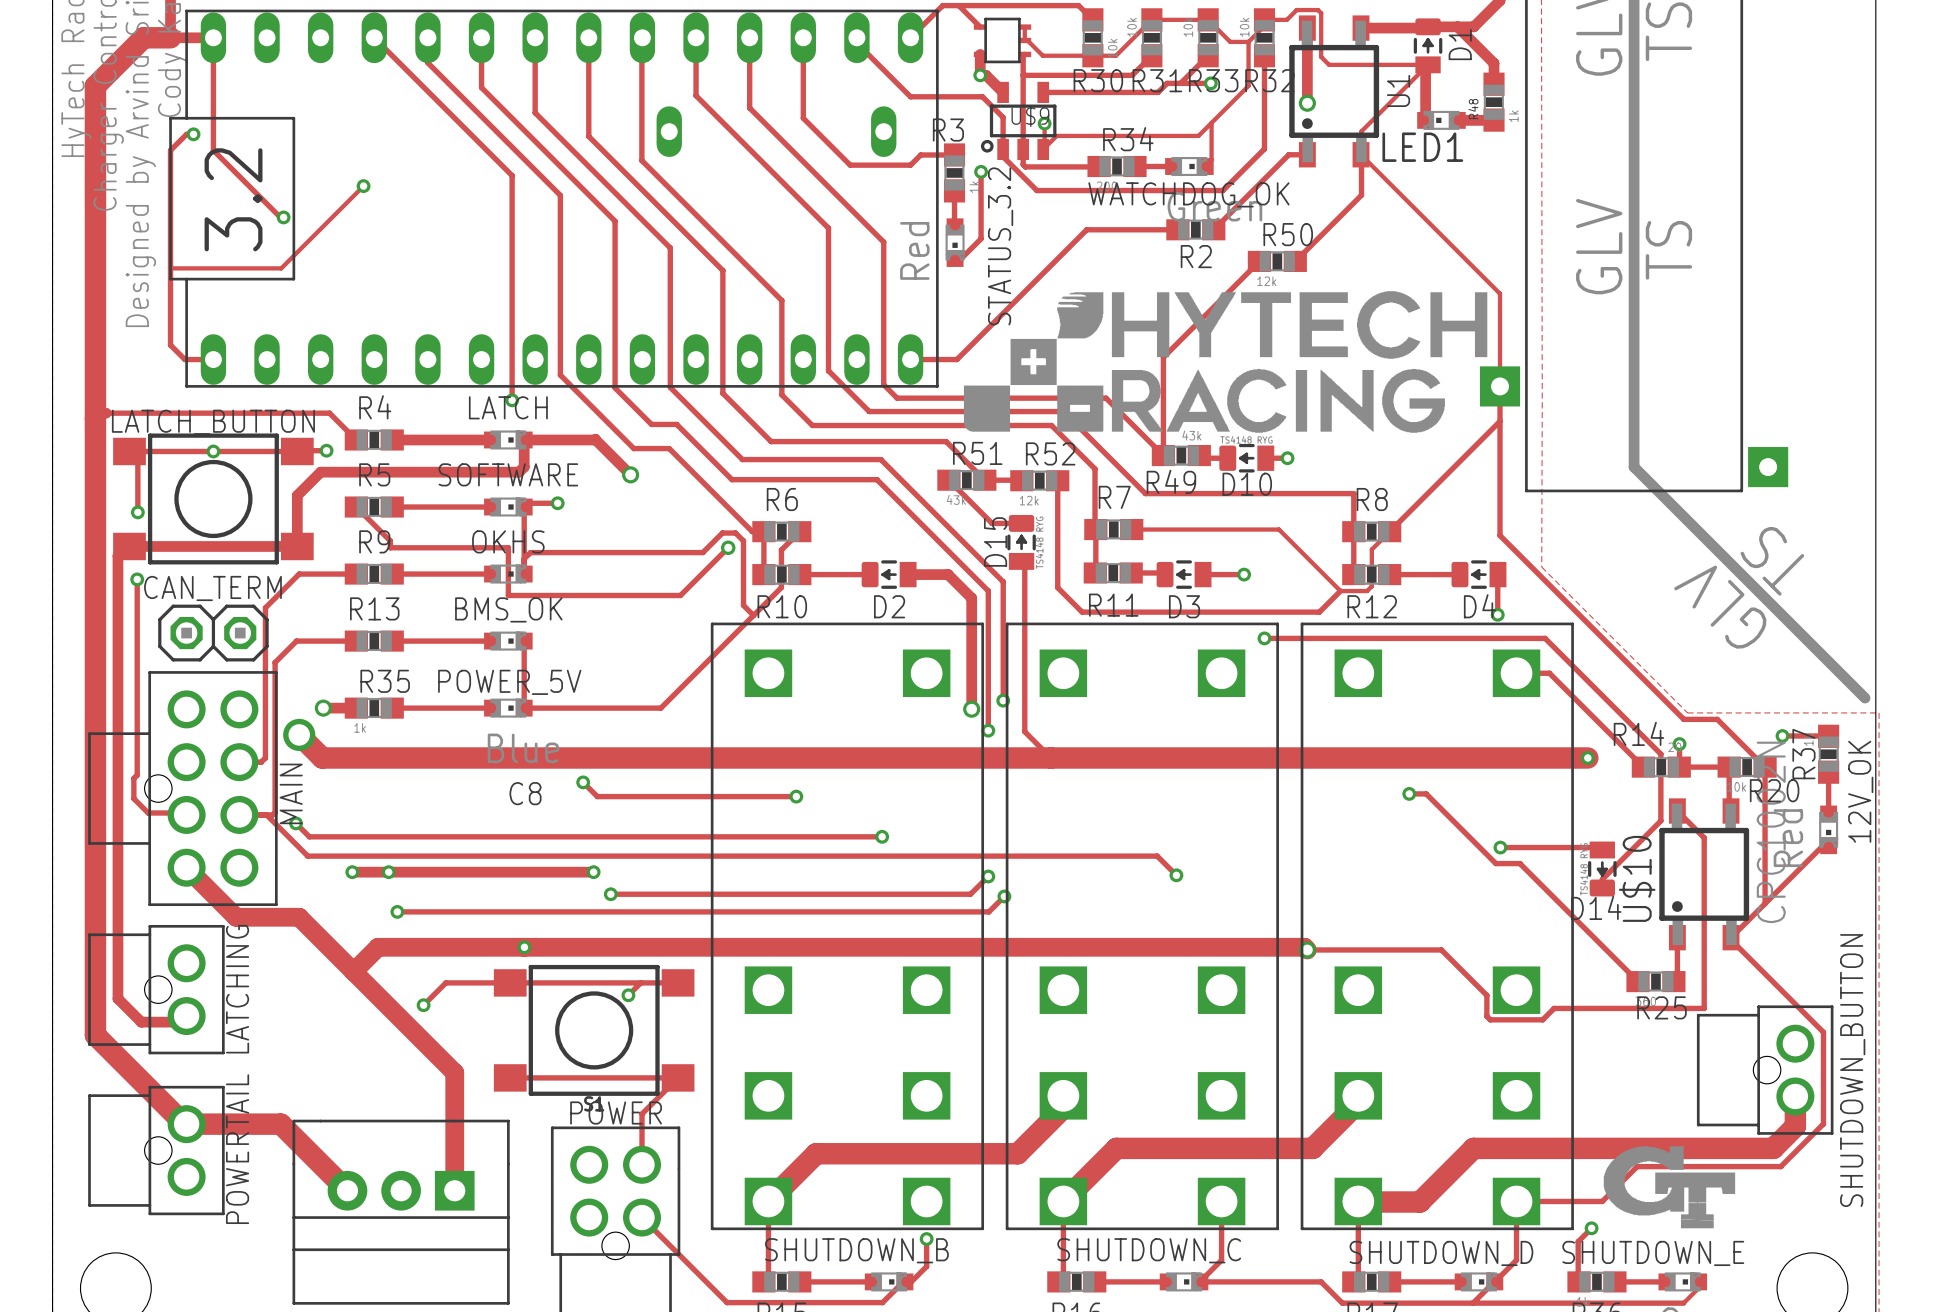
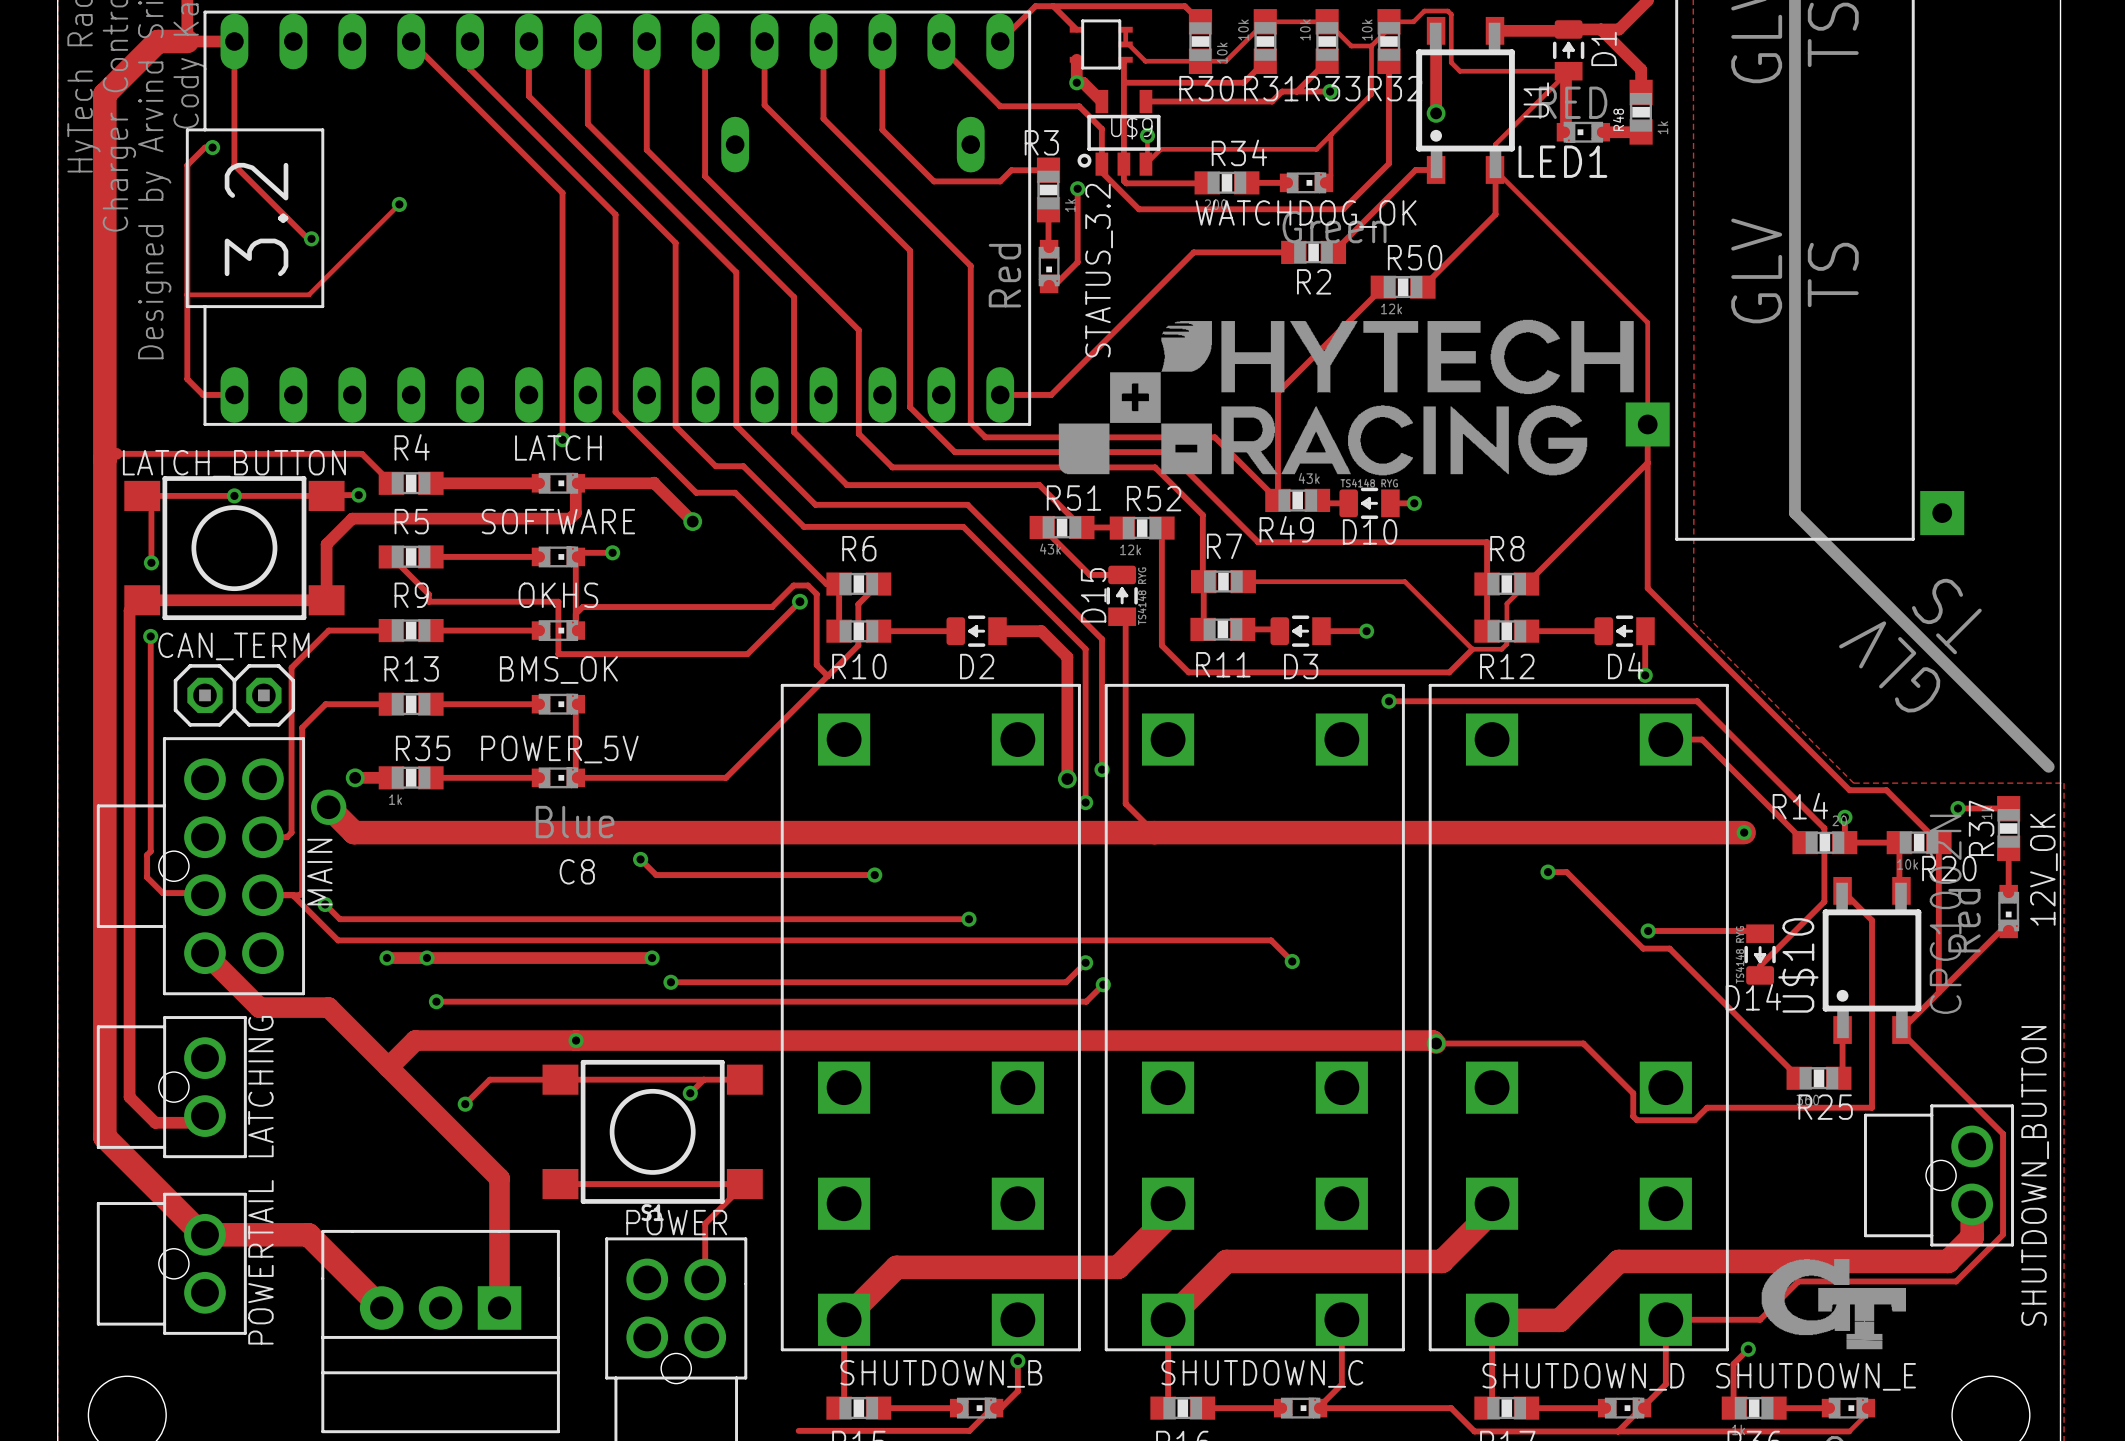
LED1 value: none -> RED (1573, 102)
track: (642, 1217) (727, 1302) -> none

